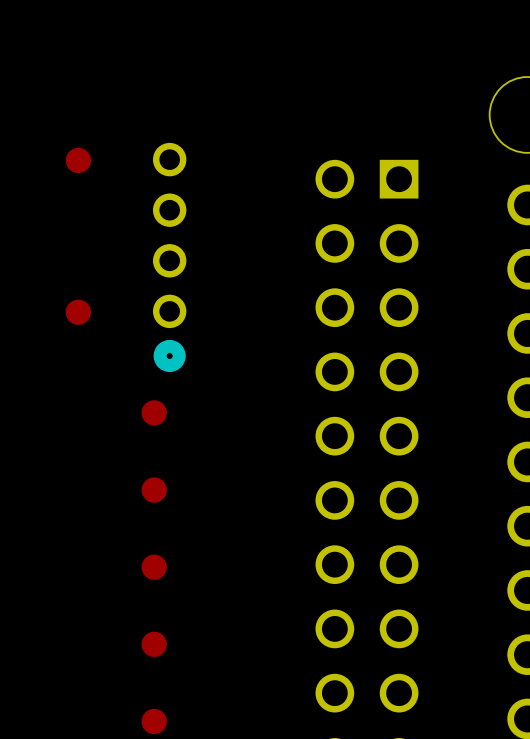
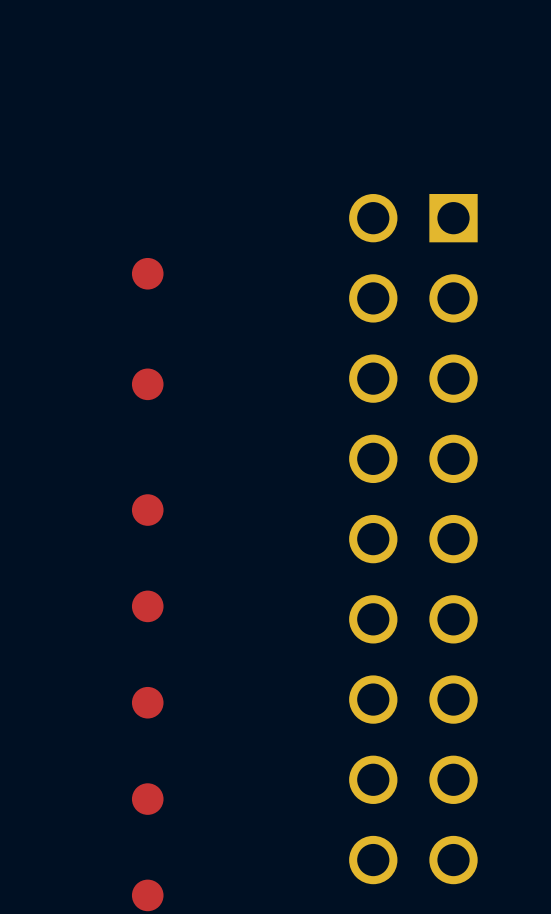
part: (78, 160) -> none
part: none -> (147, 273)
part: (169, 257) -> none
part: (78, 312) -> none
part: none -> (147, 384)

